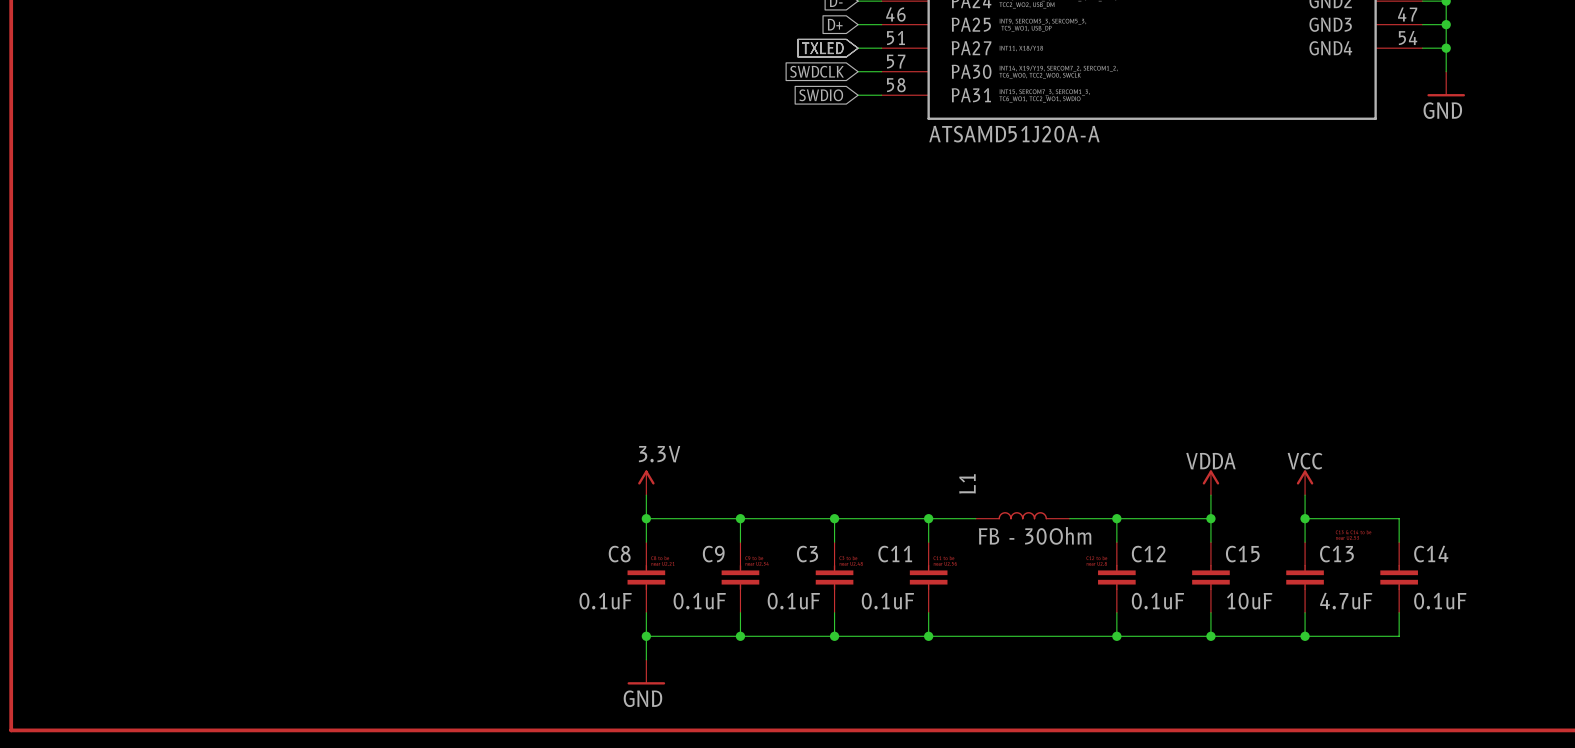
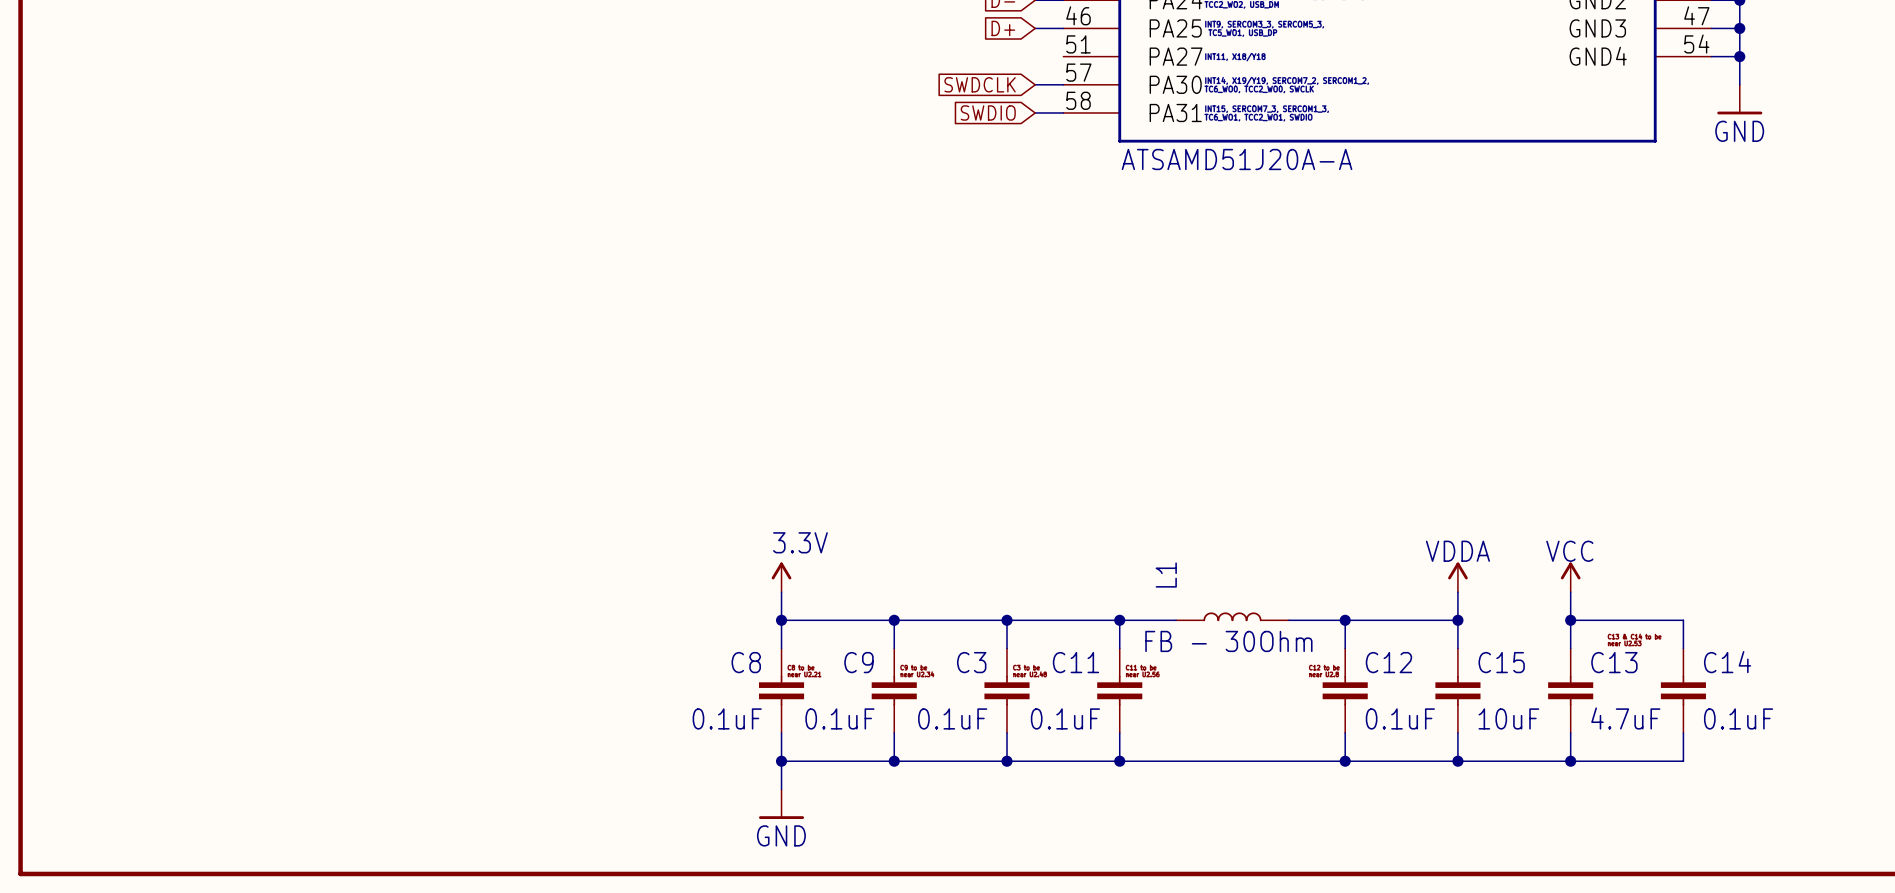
global label: TXLED (822, 48) -> none
wire: (858, 48) (881, 48) -> none

